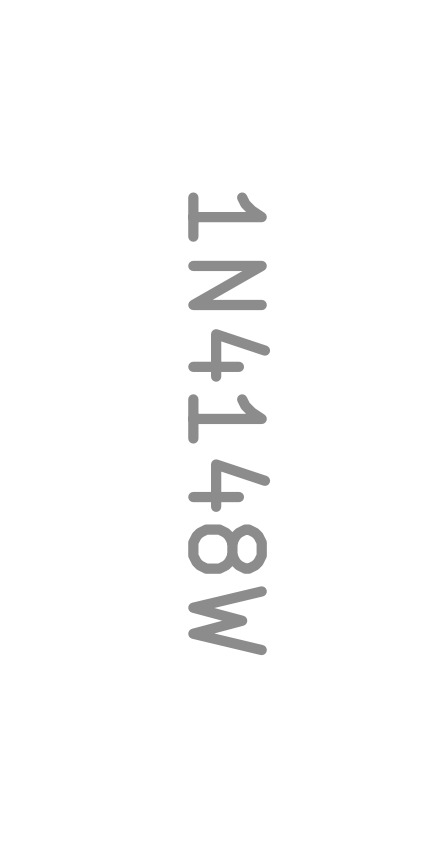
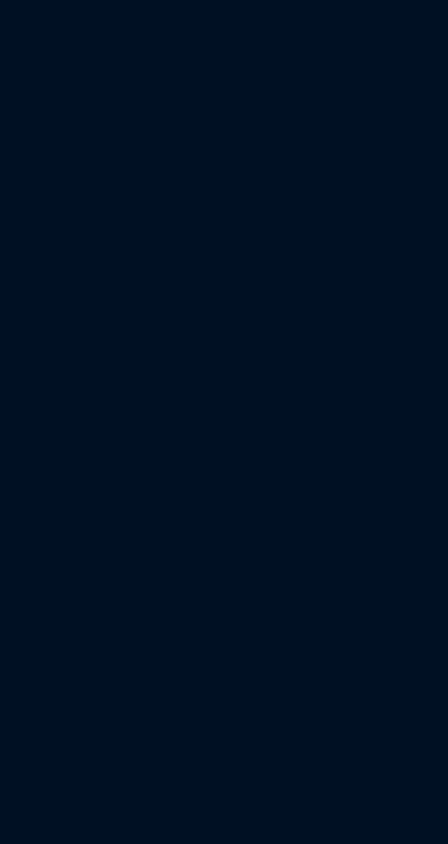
part: 1N4148W (229, 423) -> none

